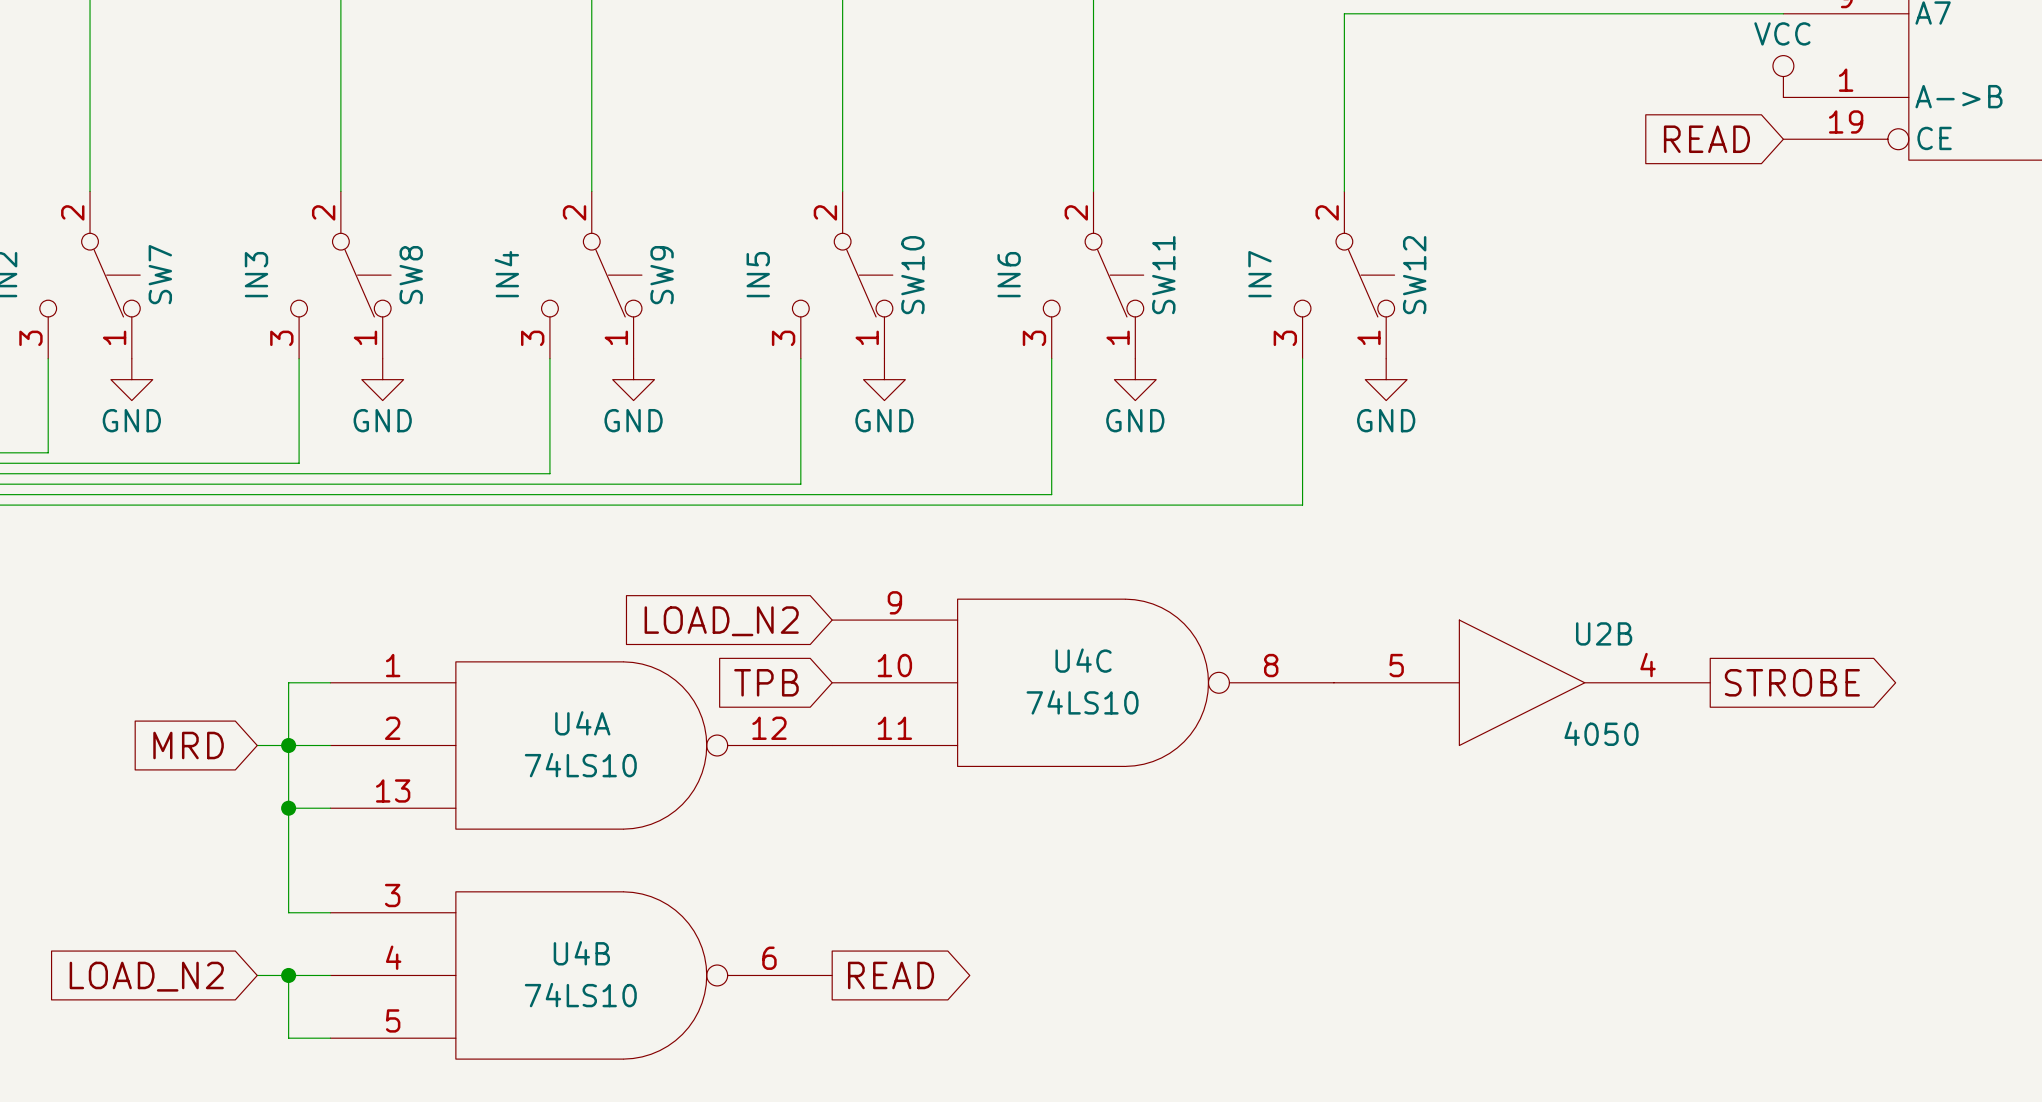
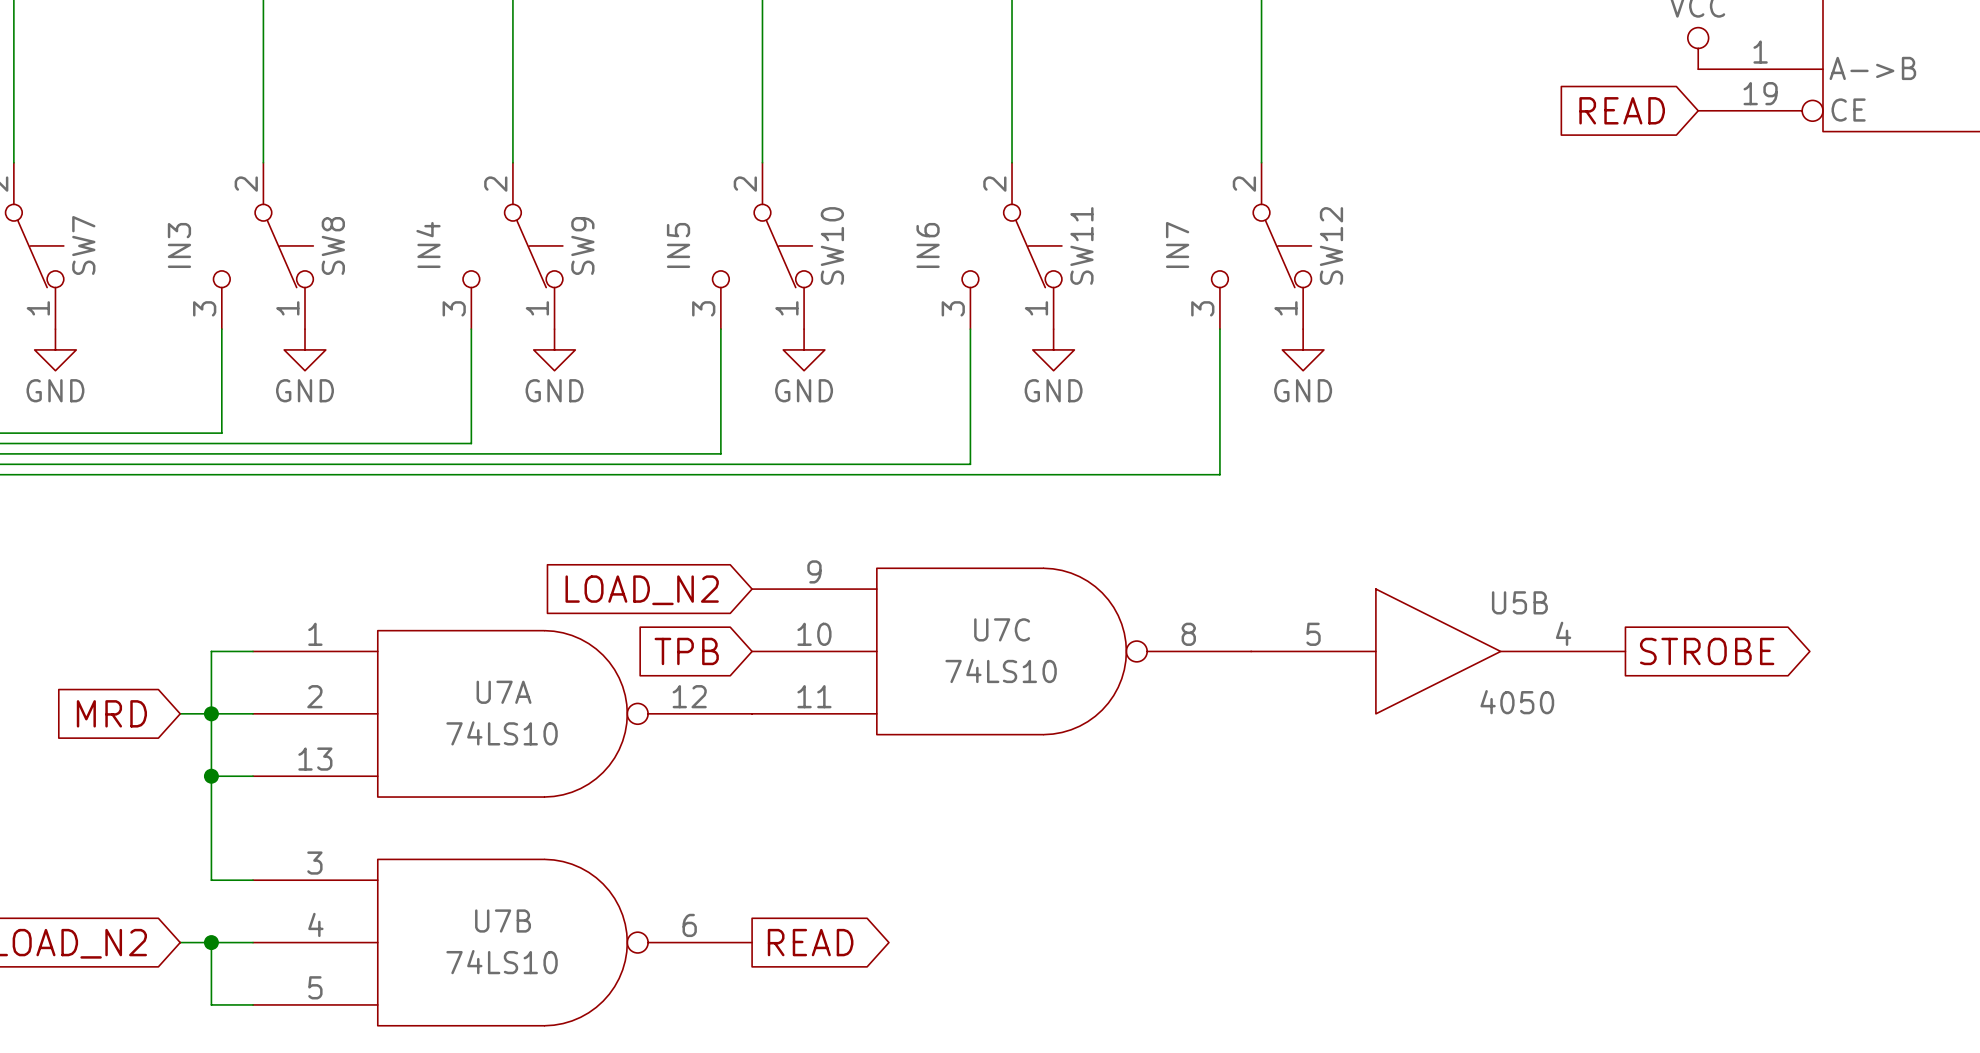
U2B name: U2B (1604, 633) -> U5B (1519, 602)
U4C name: U4C (1083, 660) -> U7C (1002, 629)
U4A name: U4A (582, 723) -> U7A (504, 692)
U4B name: U4B (581, 953) -> U7B (503, 921)

